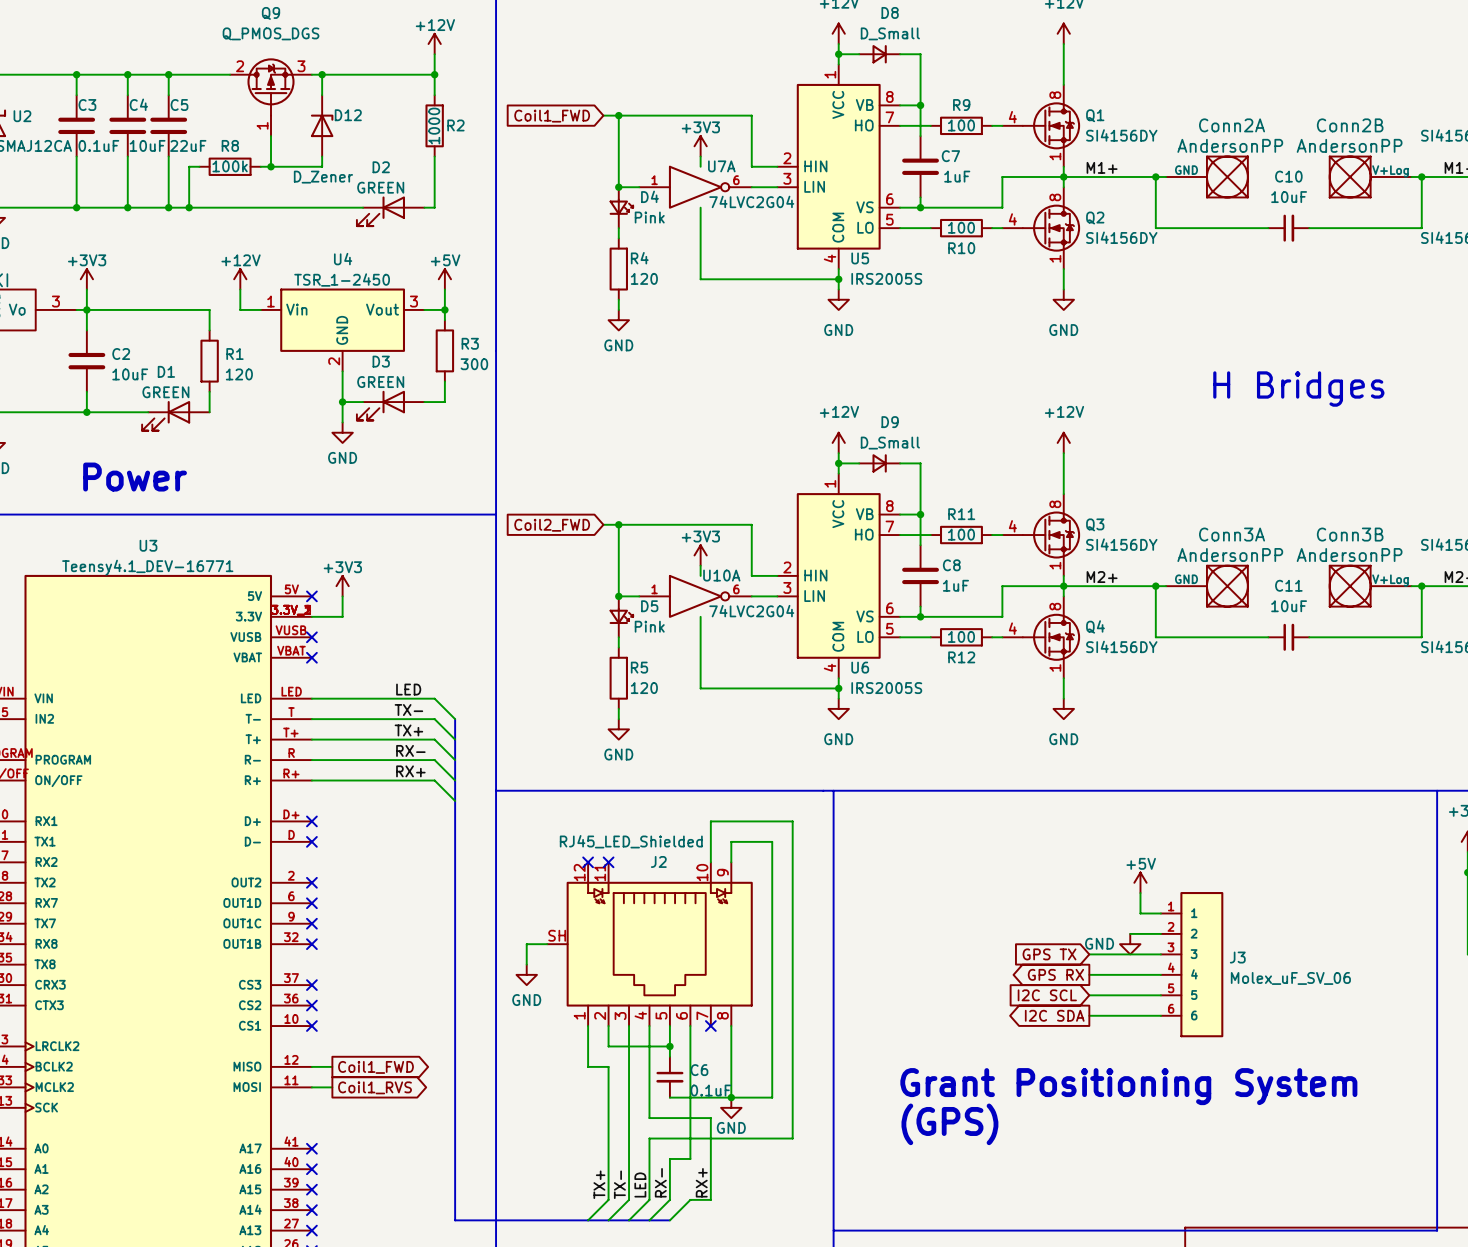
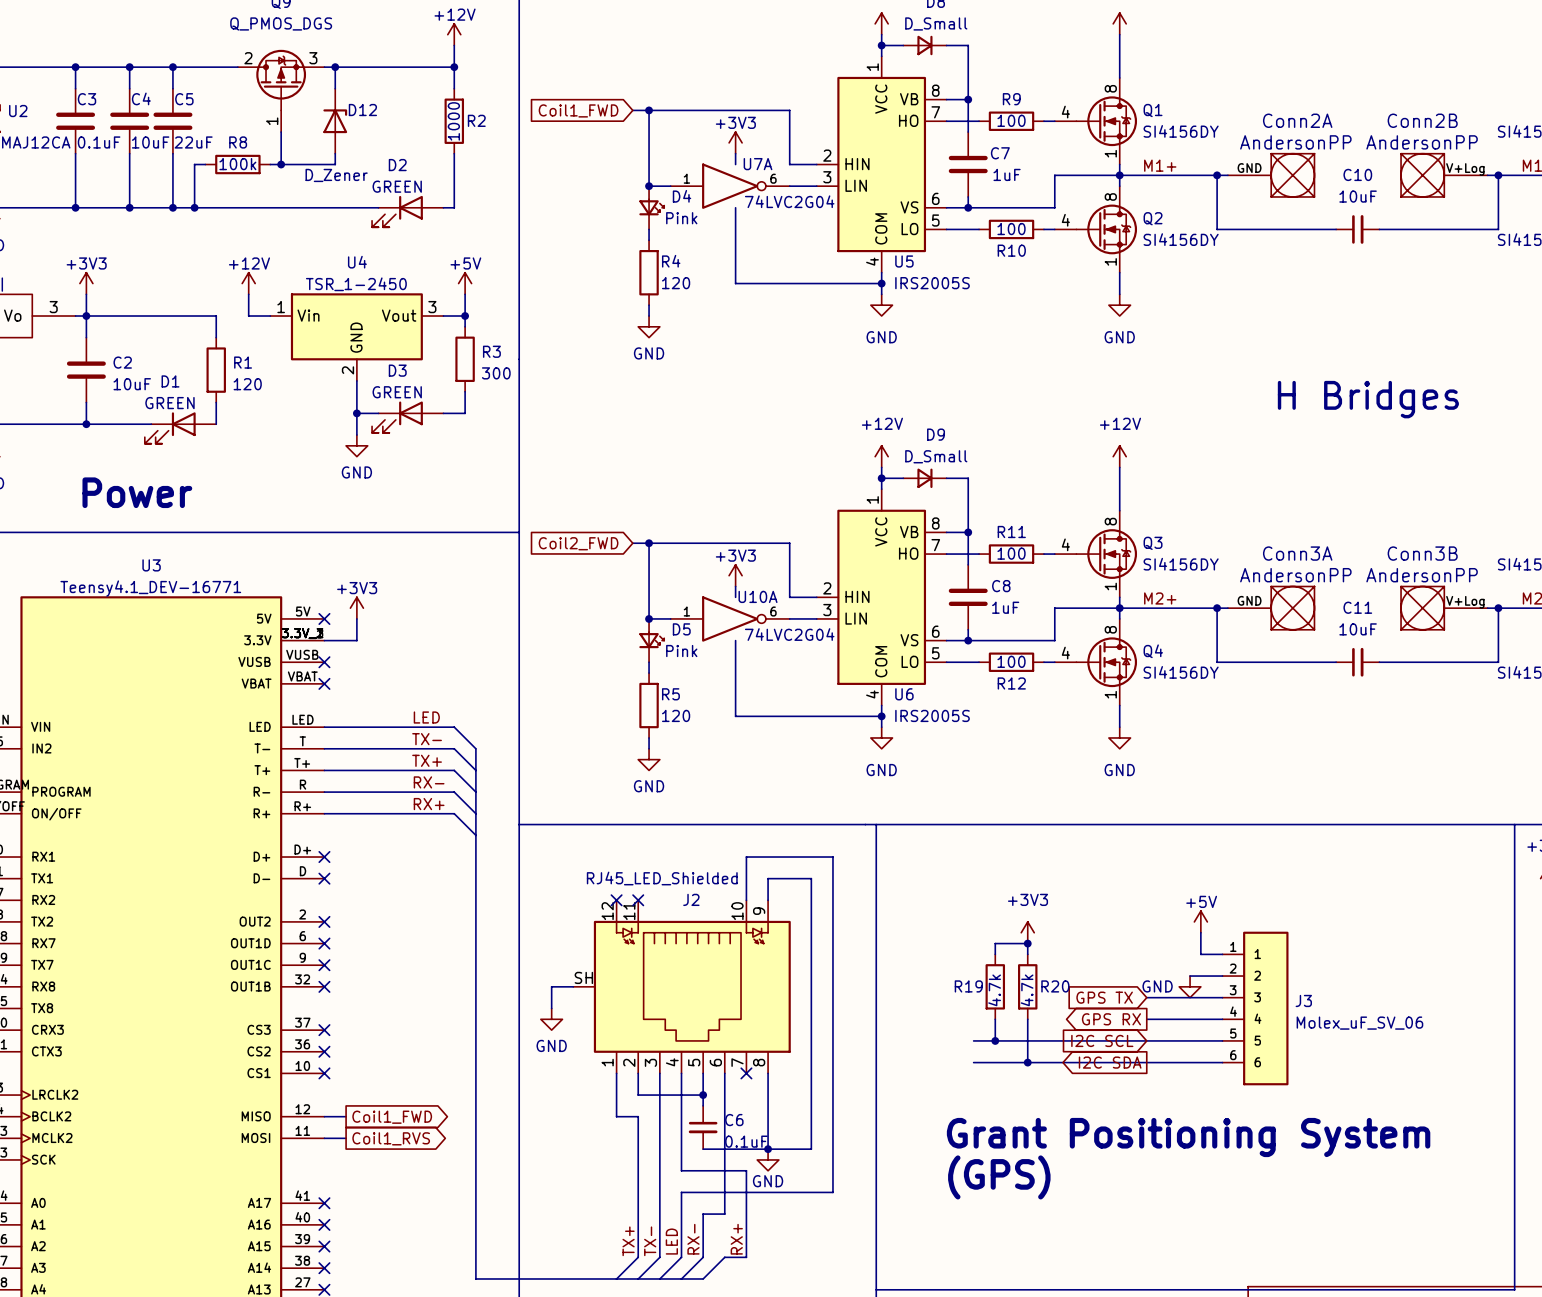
power symbol: none -> +3V3 (1027, 932)
junction: none -> (1027, 943)
wire: none -> (995, 954) (995, 943) (1027, 943) (1027, 954)
R19: none -> 4.7k (995, 986)
R20: none -> 4.7k (1027, 986)
wire: none -> (995, 1019) (995, 1040)
wire: none -> (1027, 1019) (1027, 1062)
wire: none -> (973, 1040) (1146, 1040)
junction: none -> (995, 1040)
wire: none -> (973, 1062) (1146, 1062)
junction: none -> (1027, 1062)

